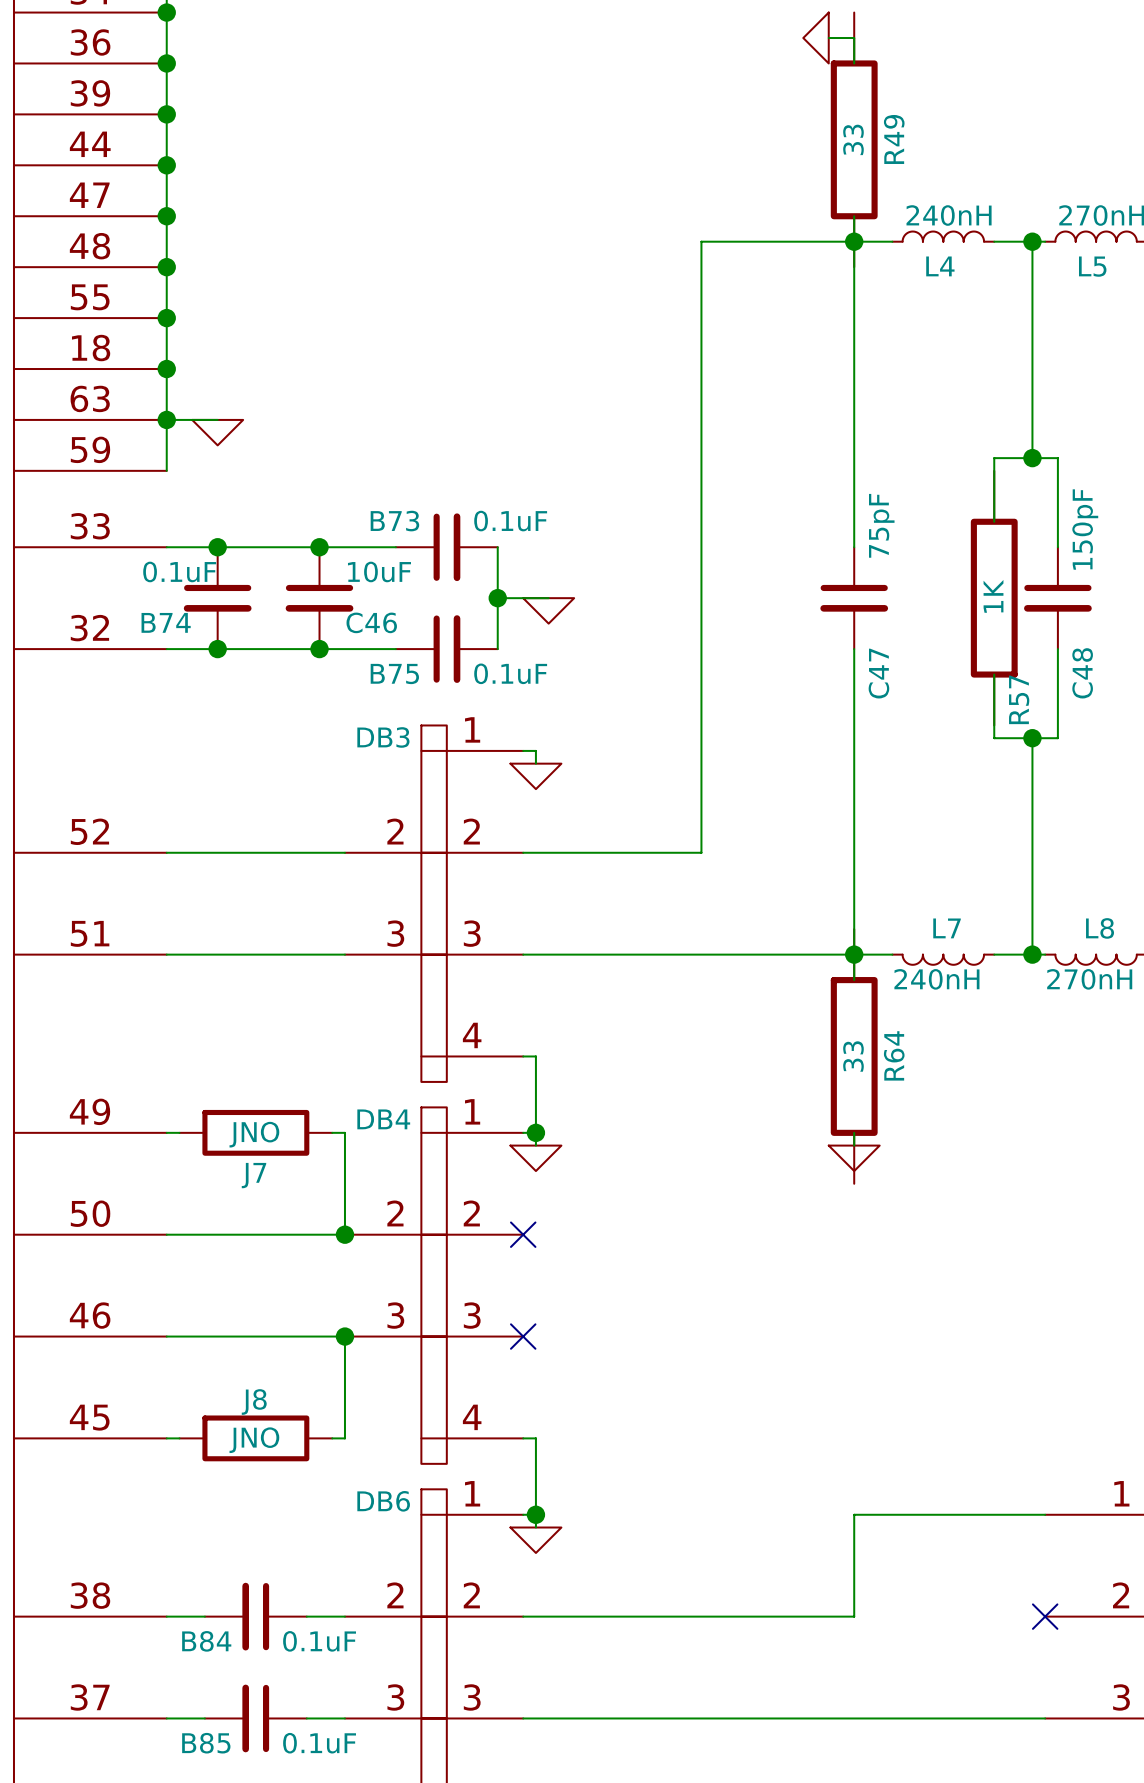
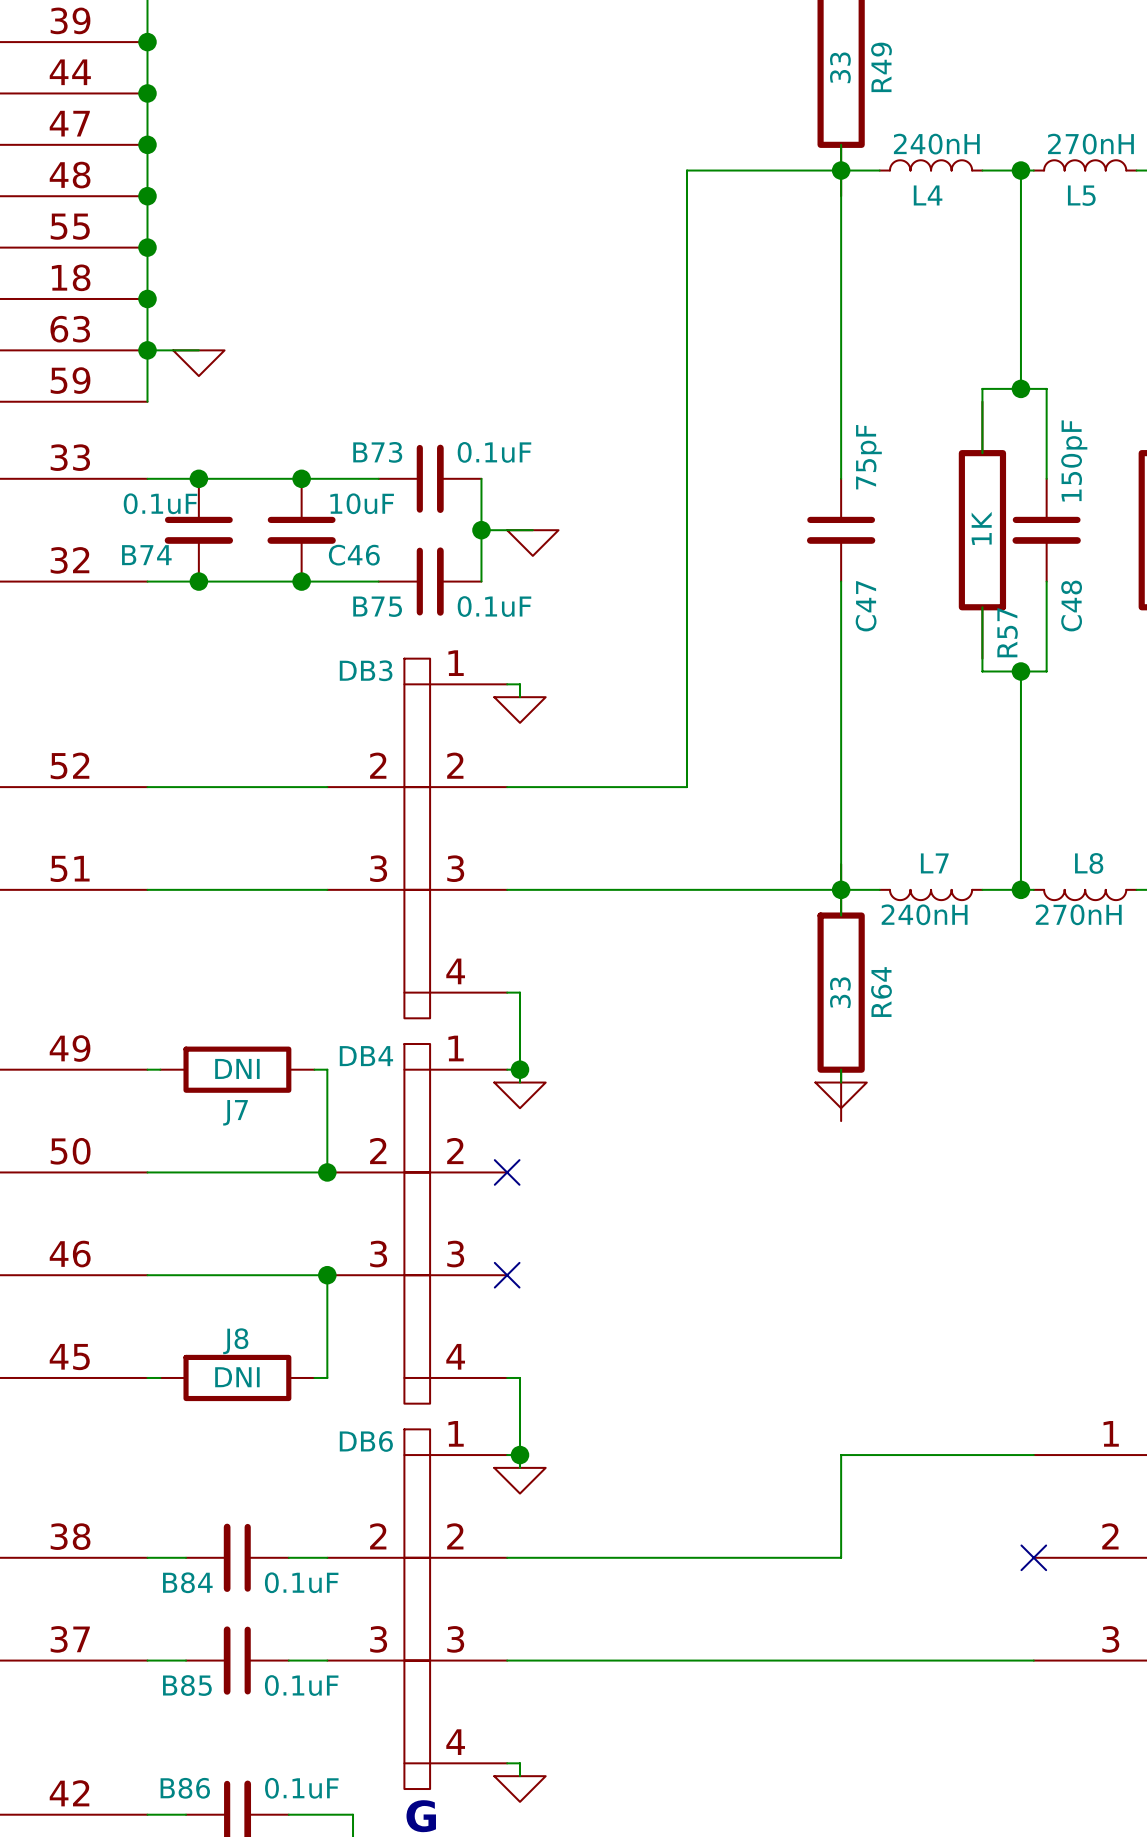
J7 value: JNO (254, 1134) -> DNI (237, 1068)
J8 value: JNO (254, 1440) -> DNI (237, 1377)

